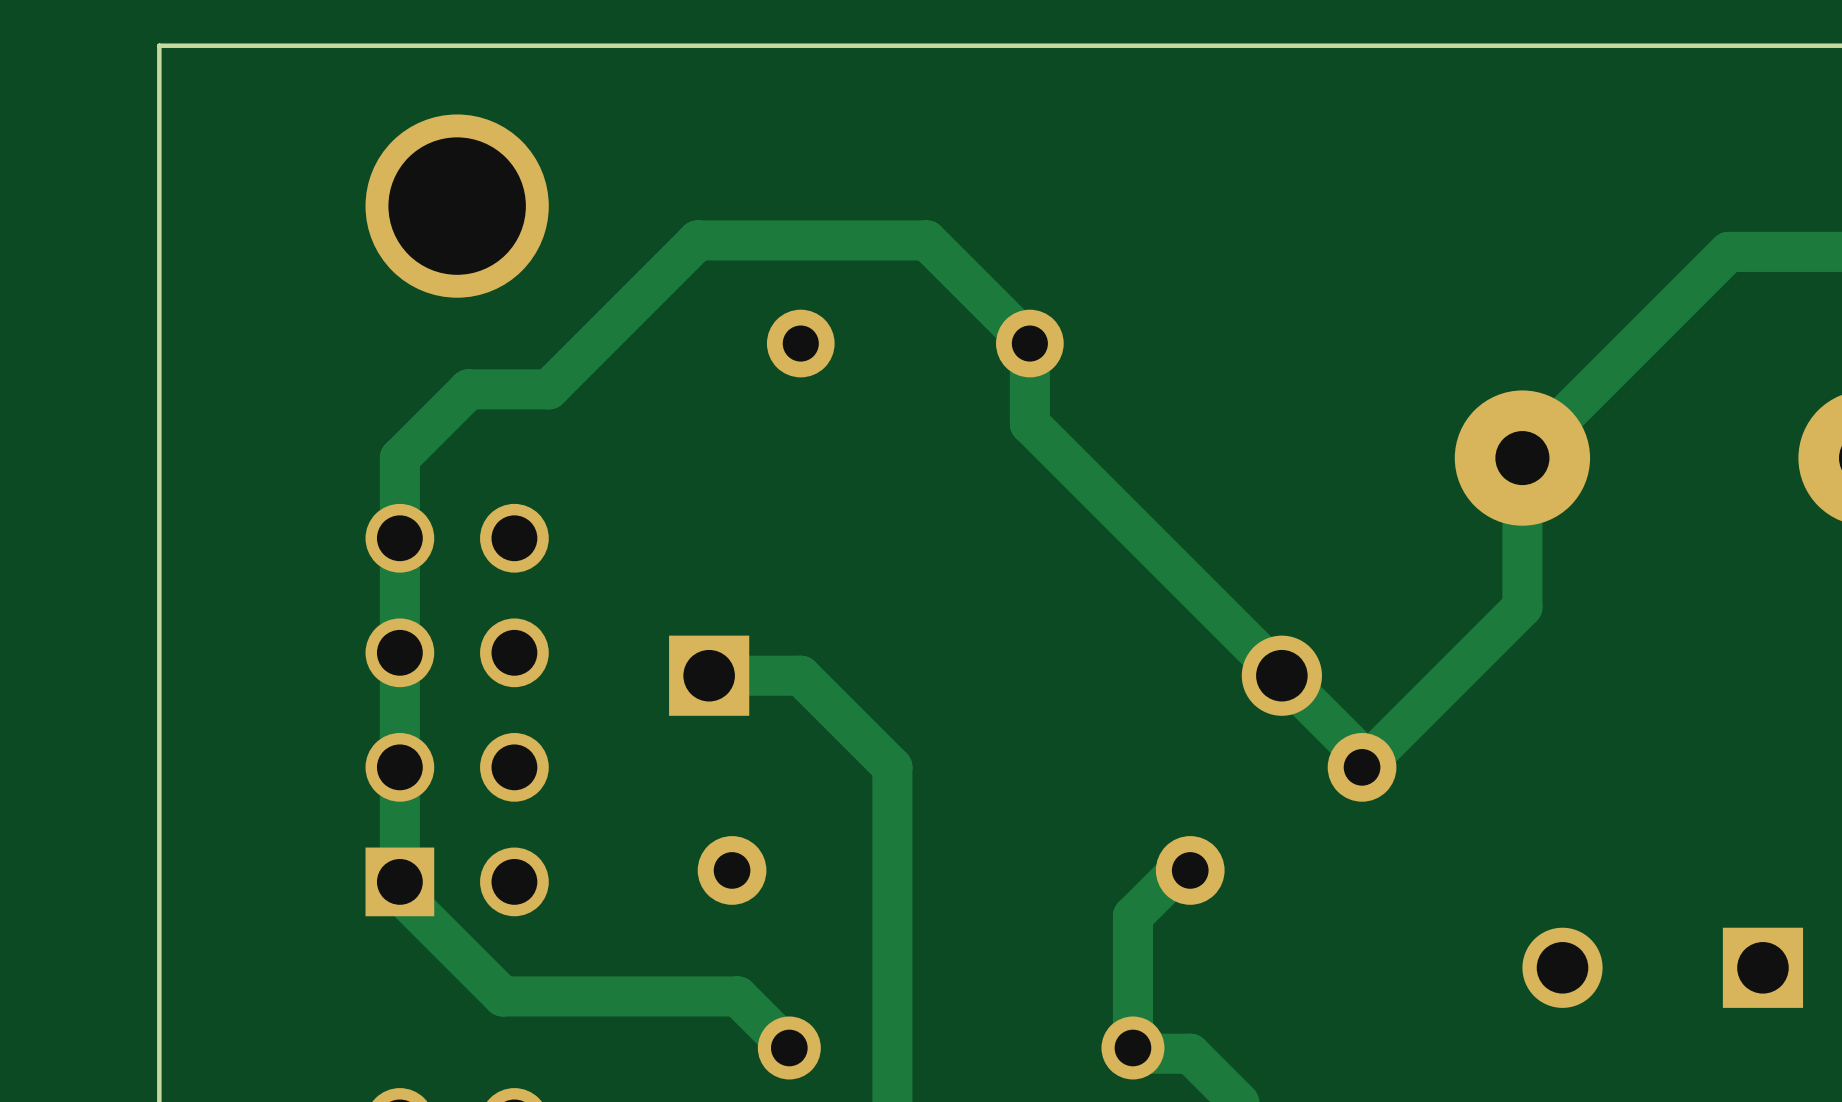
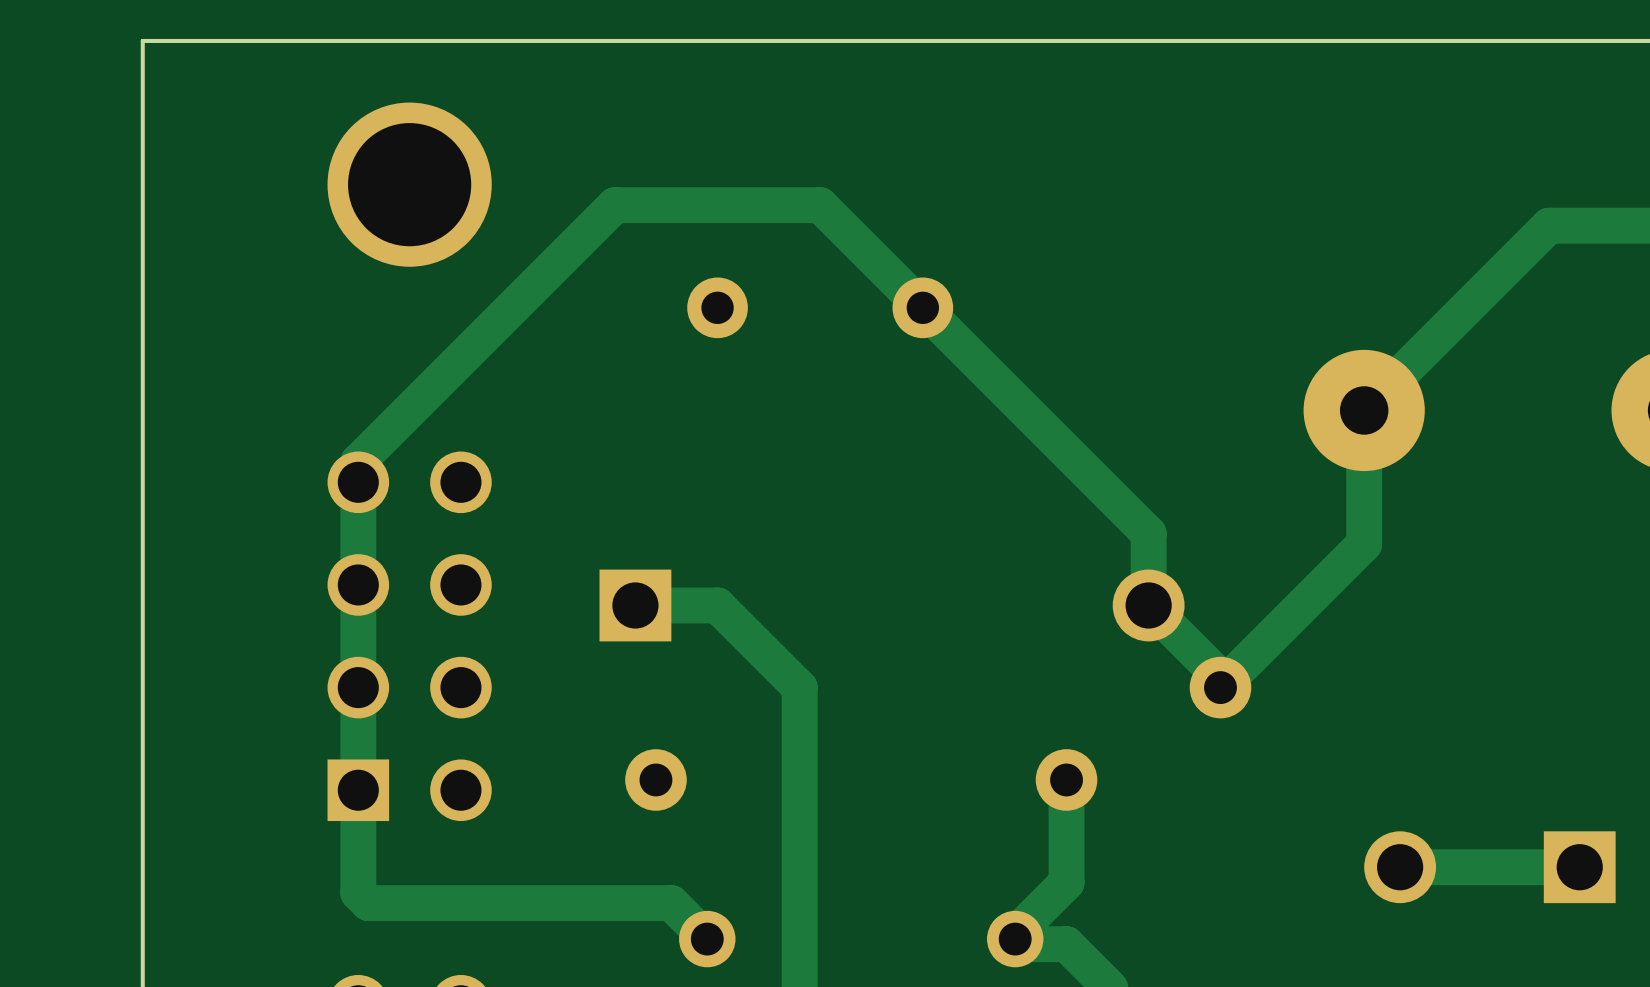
track: (926, 240) (697, 240) (548, 389) (468, 389) (399, 458) (399, 515) -> (830, 215) (820, 205) (614, 205) (358, 461)
track: (1029, 343) (1029, 423) (1281, 675) -> (922, 307) (1148, 533) (1148, 605)
track: (1190, 870) (1178, 870) (1132, 916) (1132, 1042) -> (1066, 779) (1066, 882) (1015, 933)
track: (399, 893) (502, 996) (737, 996) (749, 1007) -> (358, 800) (358, 892) (368, 903) (671, 903)
track: none -> (1579, 867) (1400, 867)

